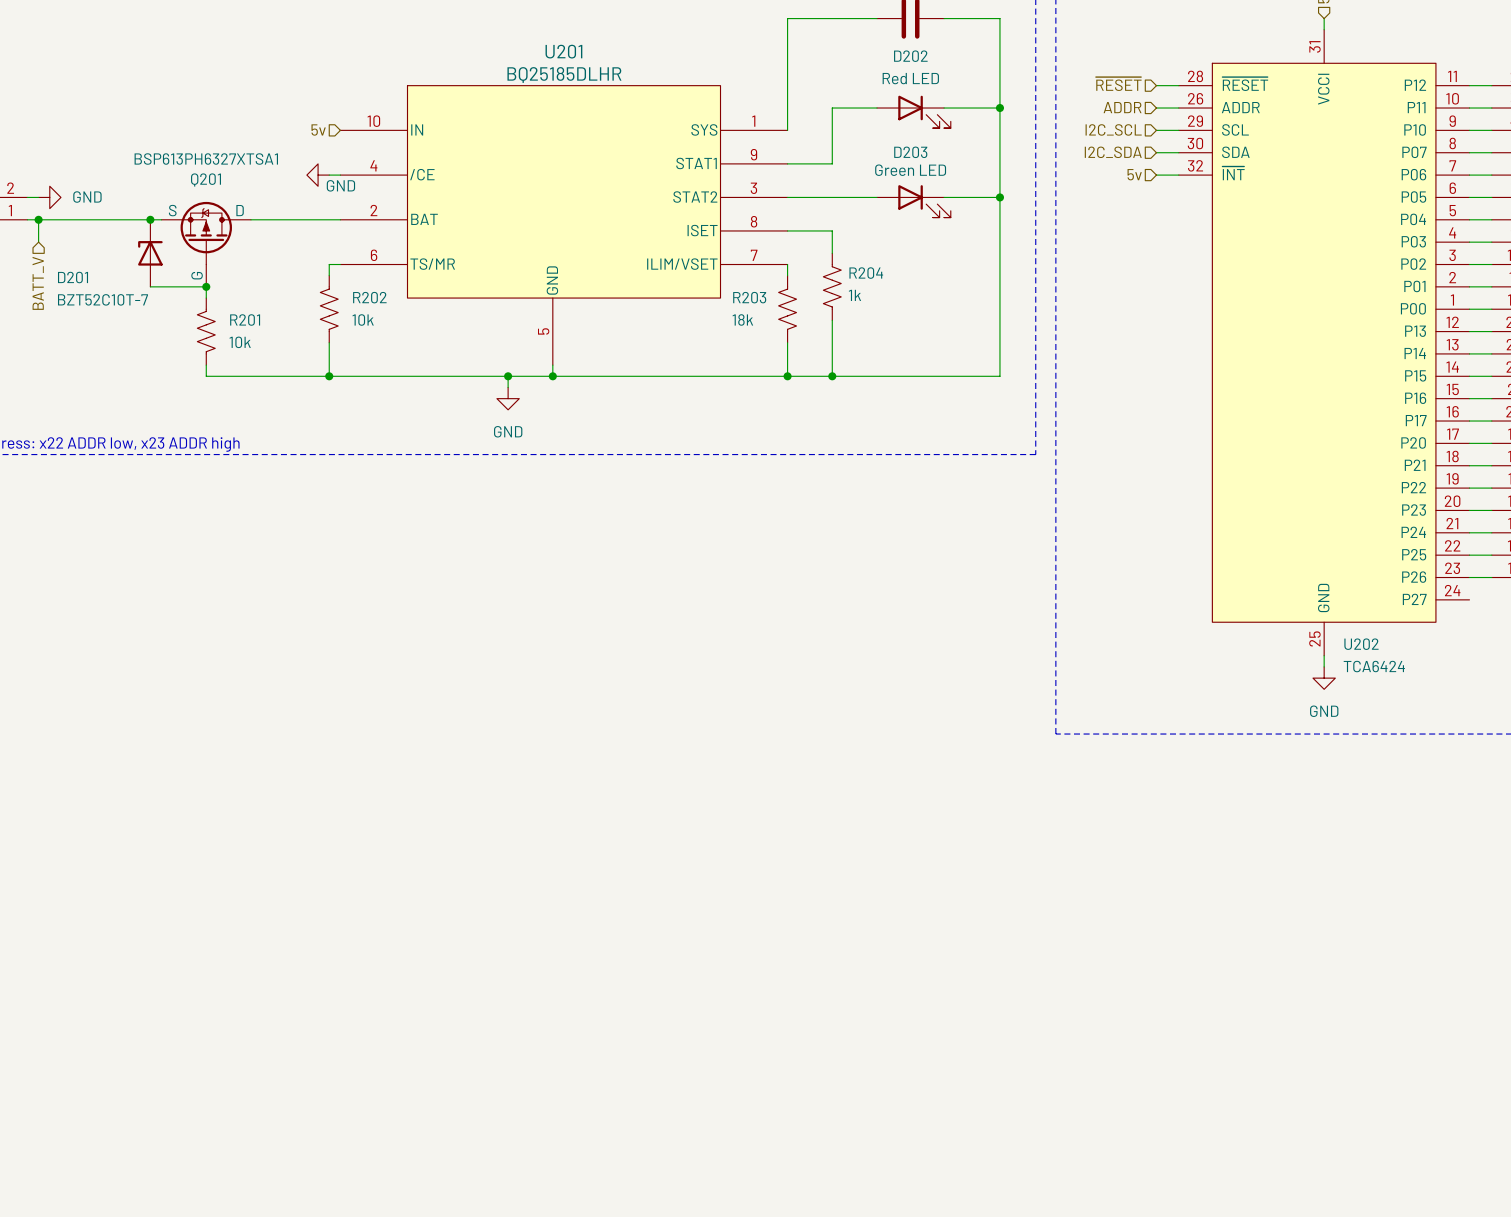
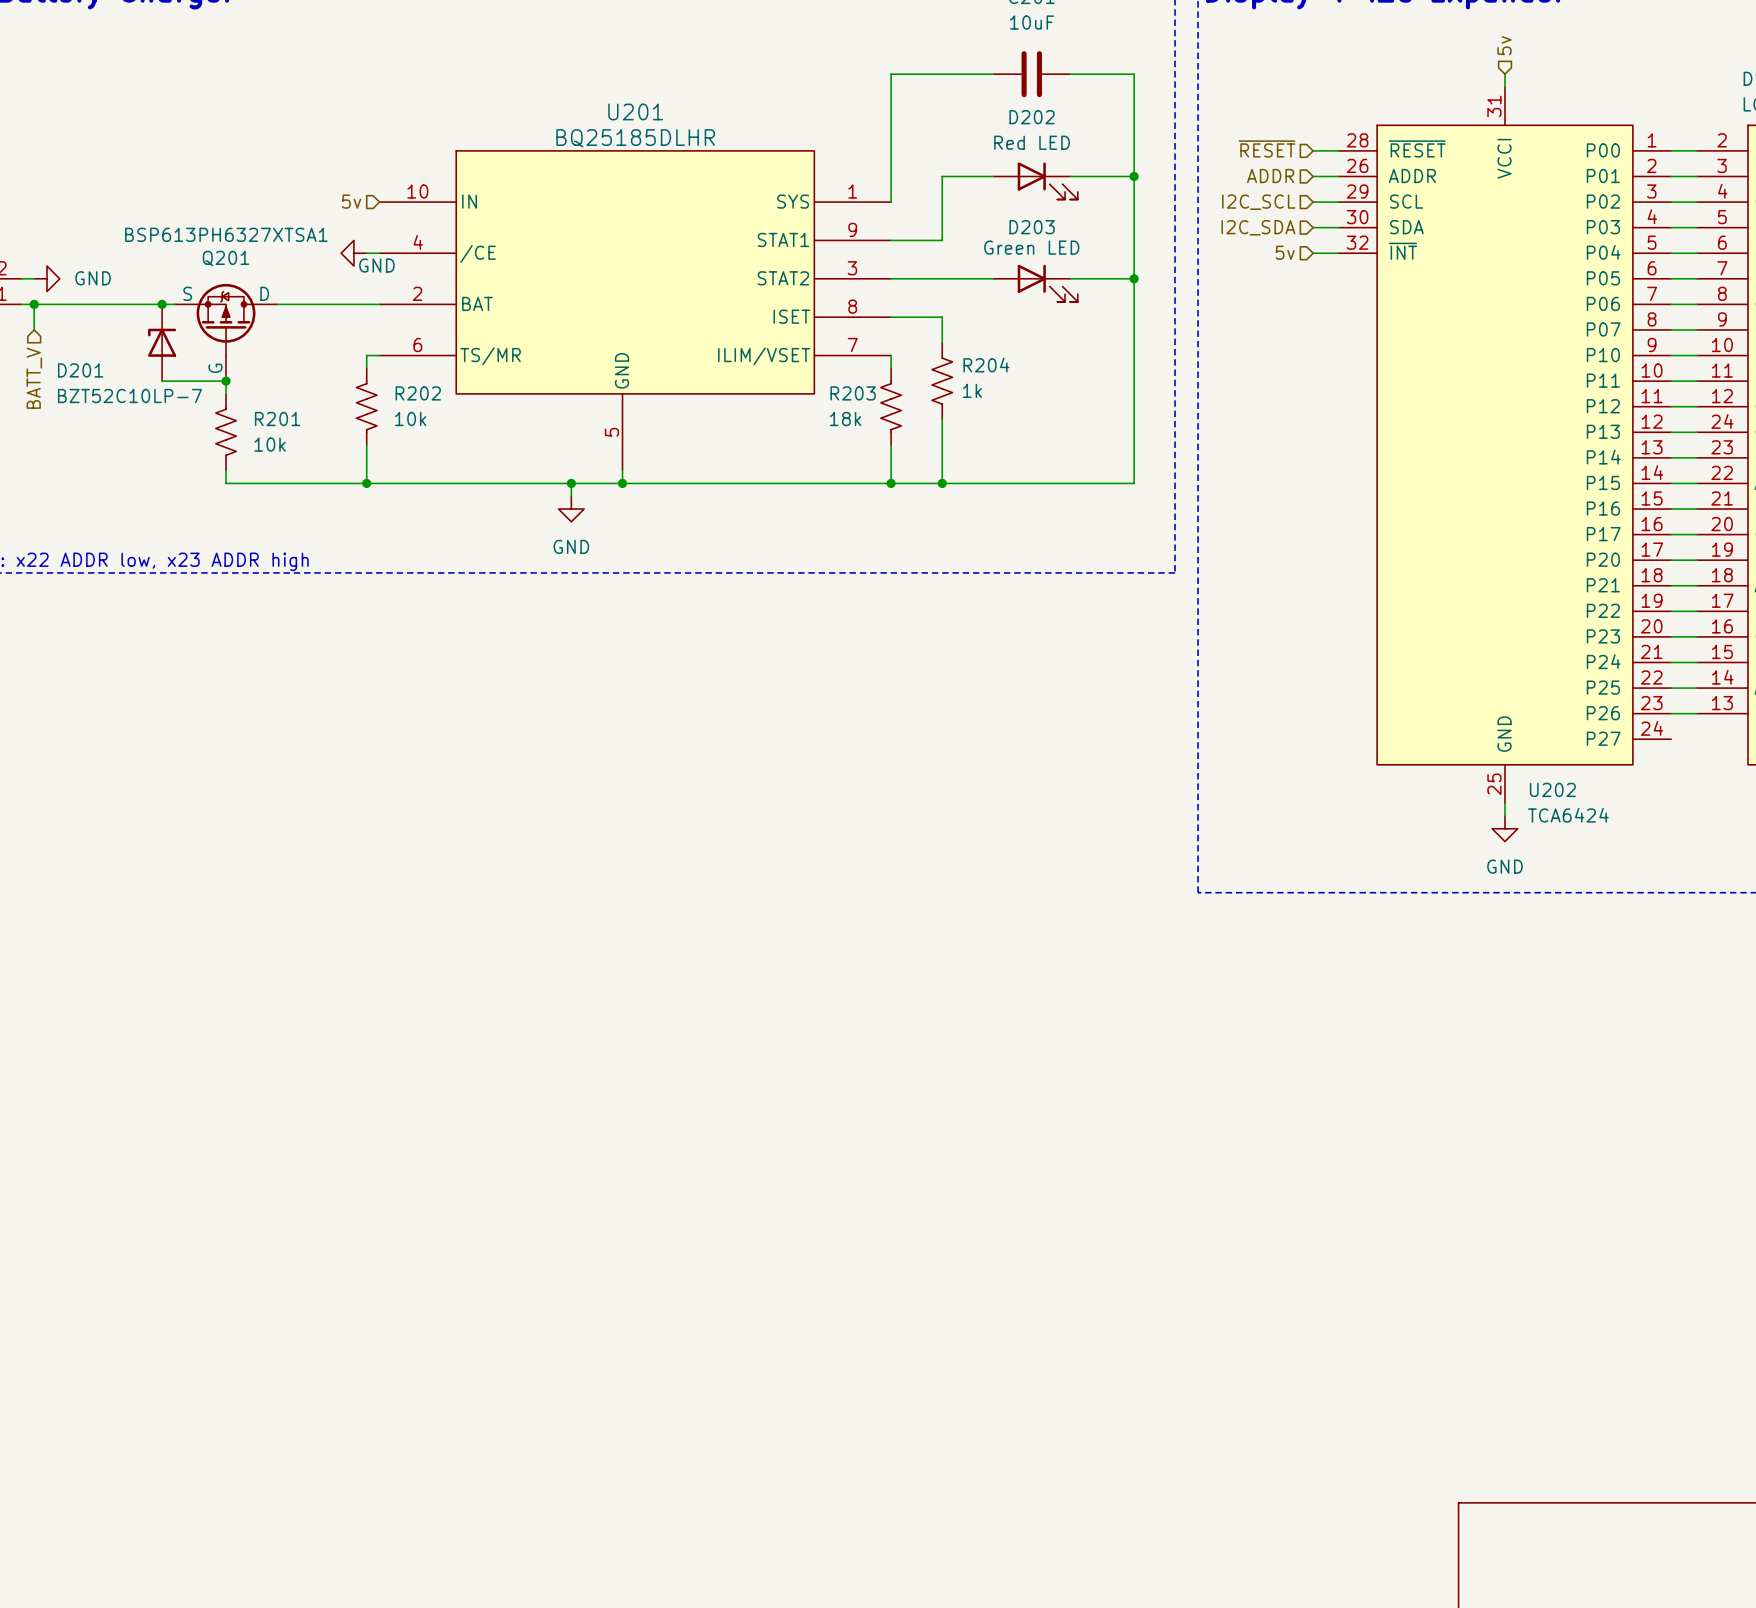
U202 symbol: [1178, 29, 1470, 656] -> [1338, 86, 1672, 804]
D201 value: BZT52C10T-7 (103, 299) -> BZT52C10LP-7 (129, 395)

